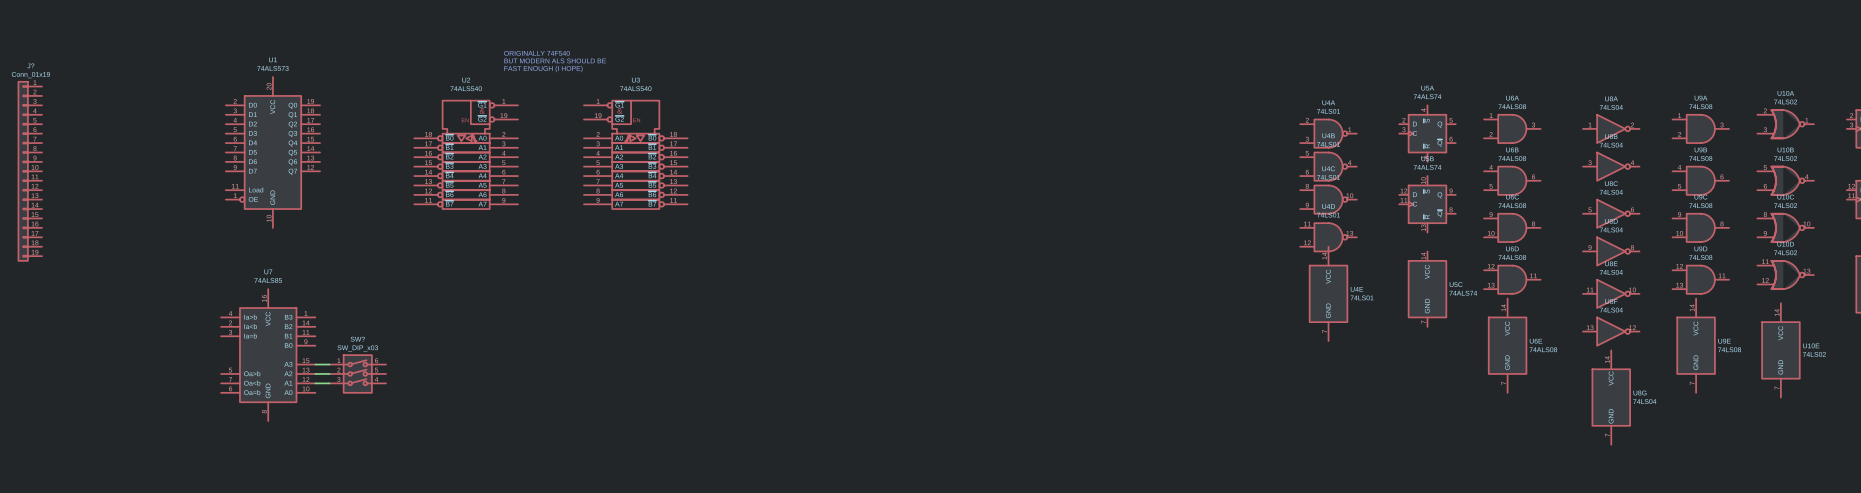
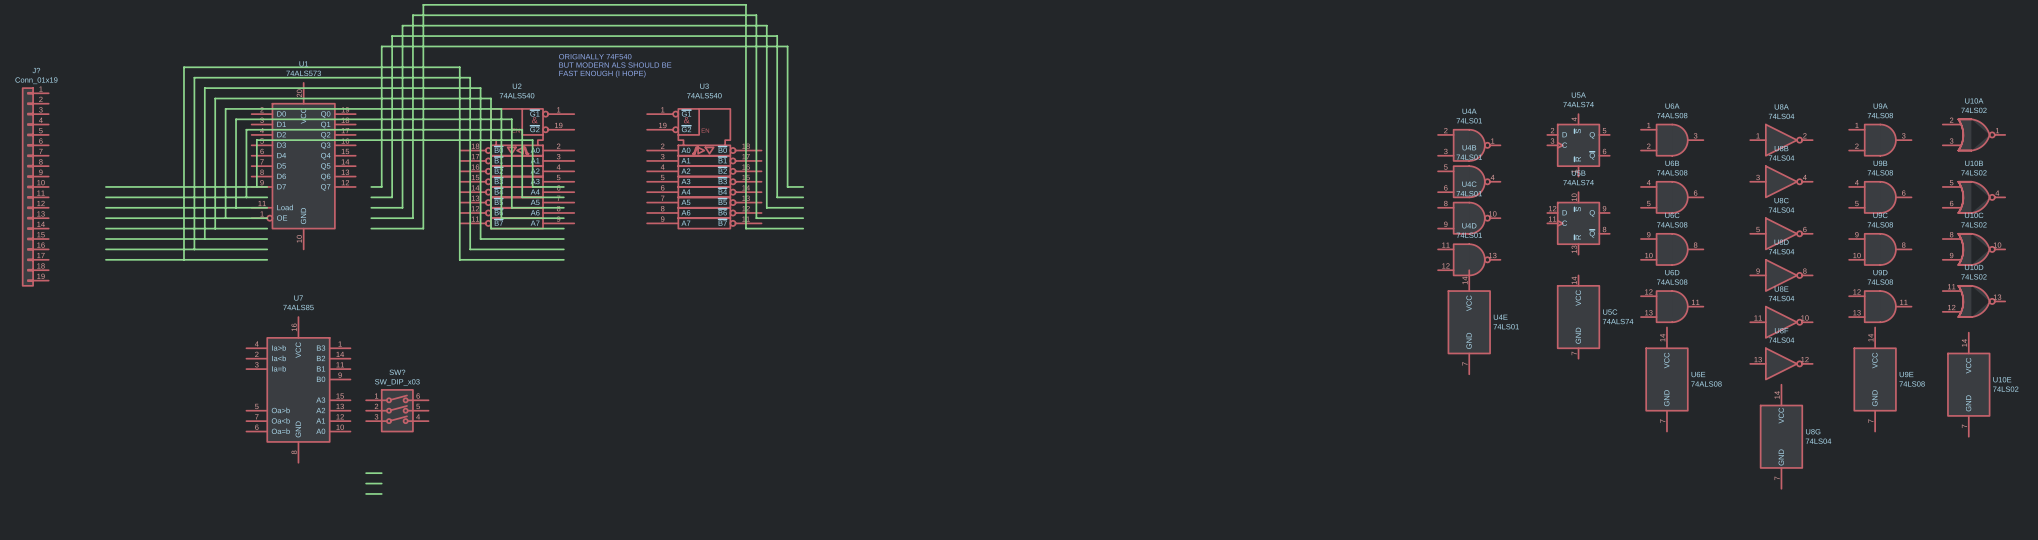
wire: none -> (105, 186) (267, 186)
wire: none -> (256, 186) (256, 140) (532, 140) (532, 186) (563, 186)
wire: none -> (371, 186) (381, 186) (381, 46) (787, 46) (787, 186) (803, 186)
wire: none -> (105, 197) (267, 197)
wire: none -> (246, 197) (246, 129) (522, 129) (522, 197) (563, 197)
wire: none -> (371, 197) (392, 197) (392, 36) (777, 36) (777, 197) (803, 197)
wire: none -> (105, 207) (267, 207)
wire: none -> (236, 207) (236, 119) (511, 119) (511, 207) (563, 207)
wire: none -> (371, 207) (402, 207) (402, 25) (766, 25) (766, 207) (803, 207)
wire: none -> (105, 218) (267, 218)
wire: none -> (225, 218) (225, 108) (501, 108) (501, 218) (563, 218)
wire: none -> (371, 218) (412, 218) (412, 15) (756, 15) (756, 218) (803, 218)
wire: none -> (105, 228) (267, 228)
wire: none -> (215, 228) (215, 98) (490, 98) (490, 228) (563, 228)
wire: none -> (371, 228) (423, 228) (423, 4) (745, 4) (745, 228) (803, 228)
wire: none -> (105, 239) (267, 239)
wire: none -> (204, 239) (204, 88) (480, 88) (480, 239) (563, 239)
wire: none -> (105, 249) (267, 249)
wire: none -> (194, 249) (194, 77) (470, 77) (470, 249) (563, 249)
wire: none -> (105, 259) (267, 259)
wire: none -> (183, 259) (183, 67) (459, 67) (459, 259) (563, 259)
wire: (315, 364) (329, 364) -> (366, 473) (381, 473)
wire: (315, 373) (329, 373) -> (366, 483) (381, 483)
wire: (315, 383) (329, 383) -> (366, 493) (381, 493)

